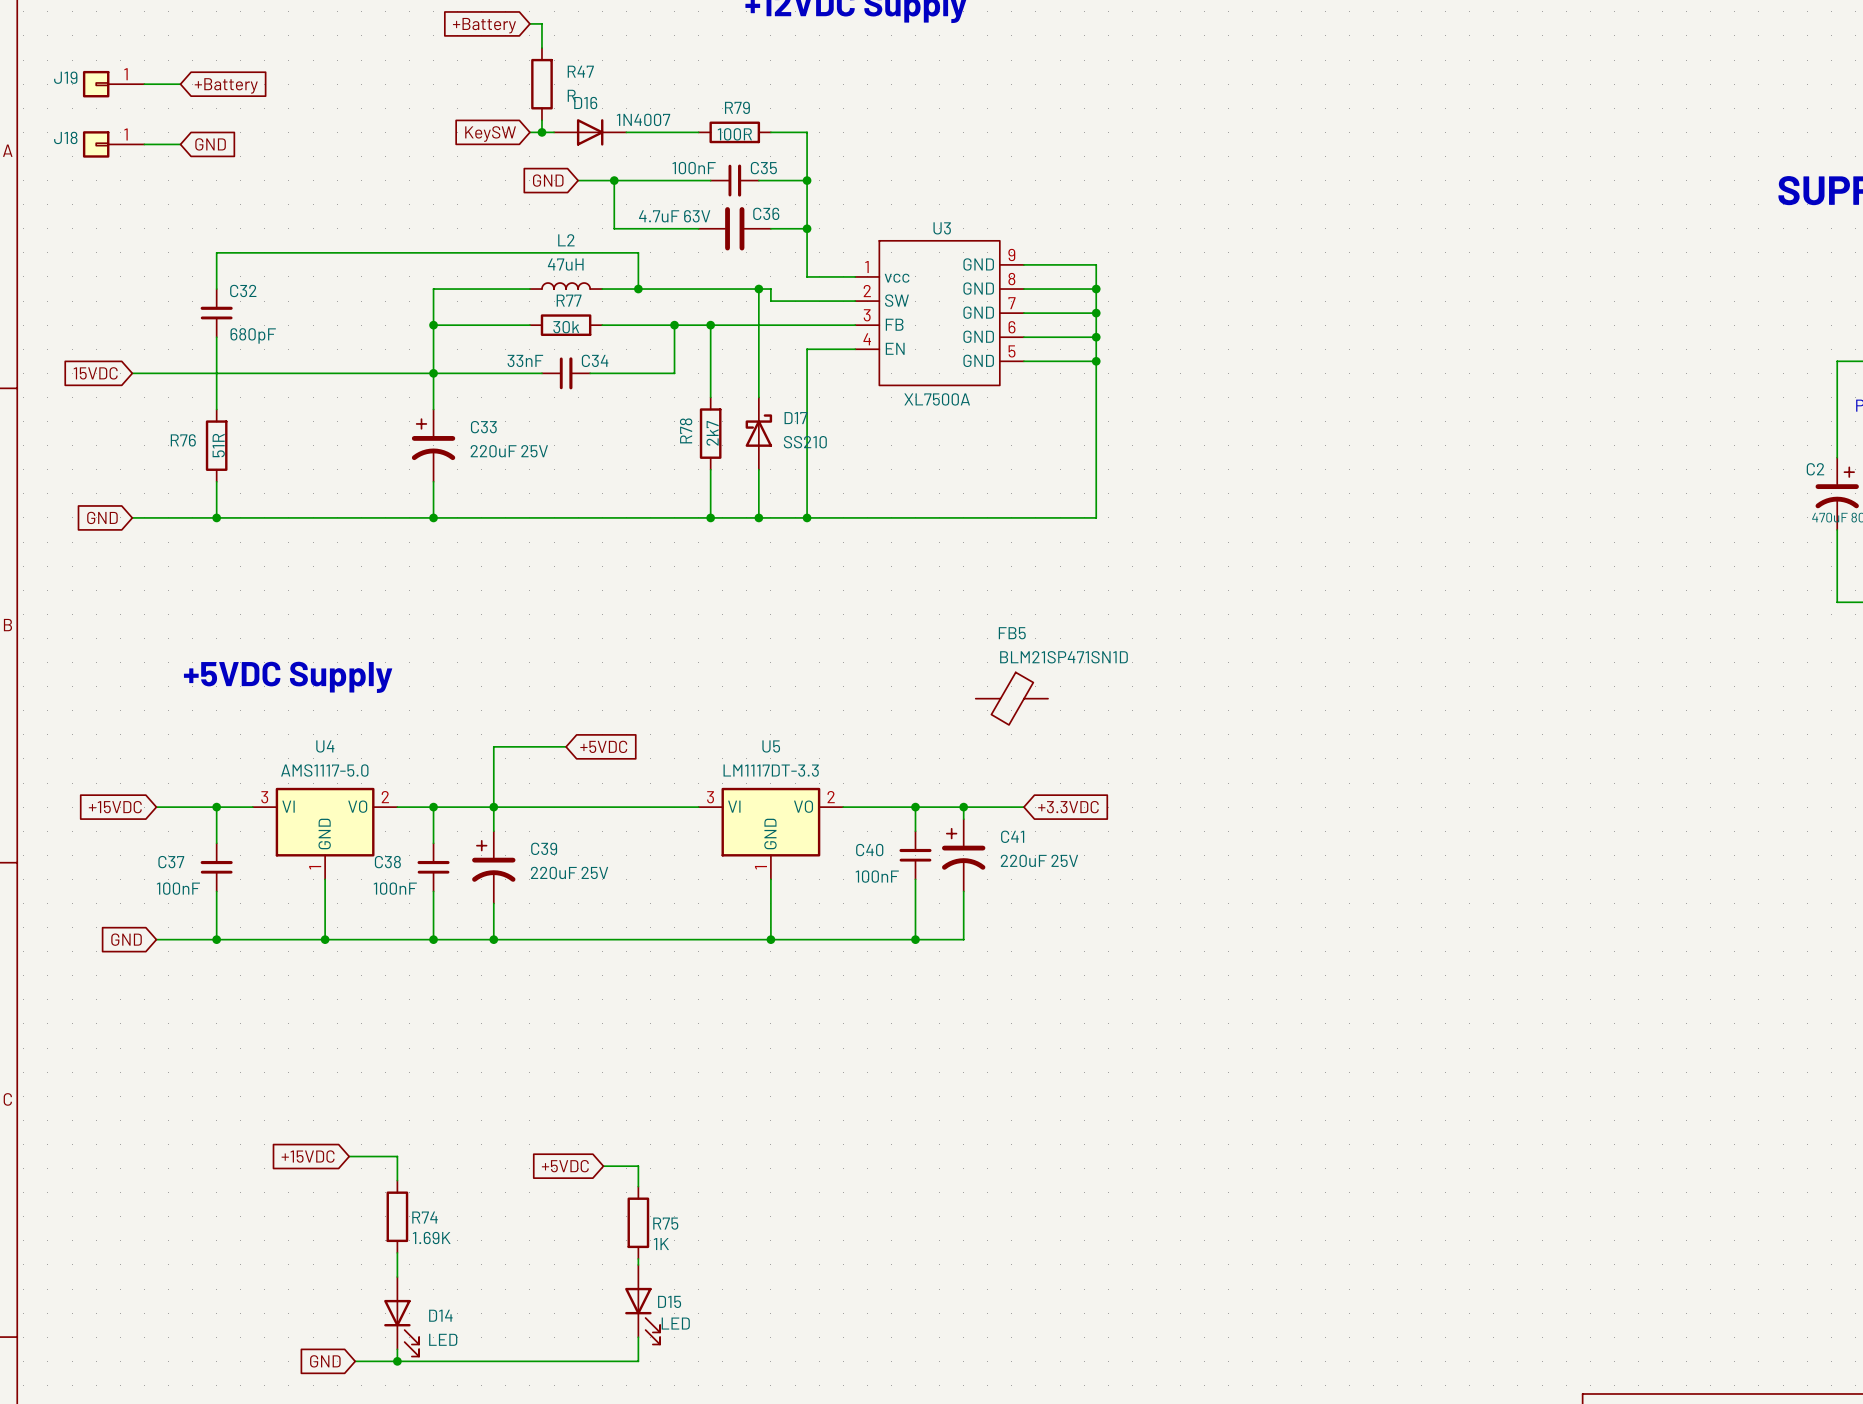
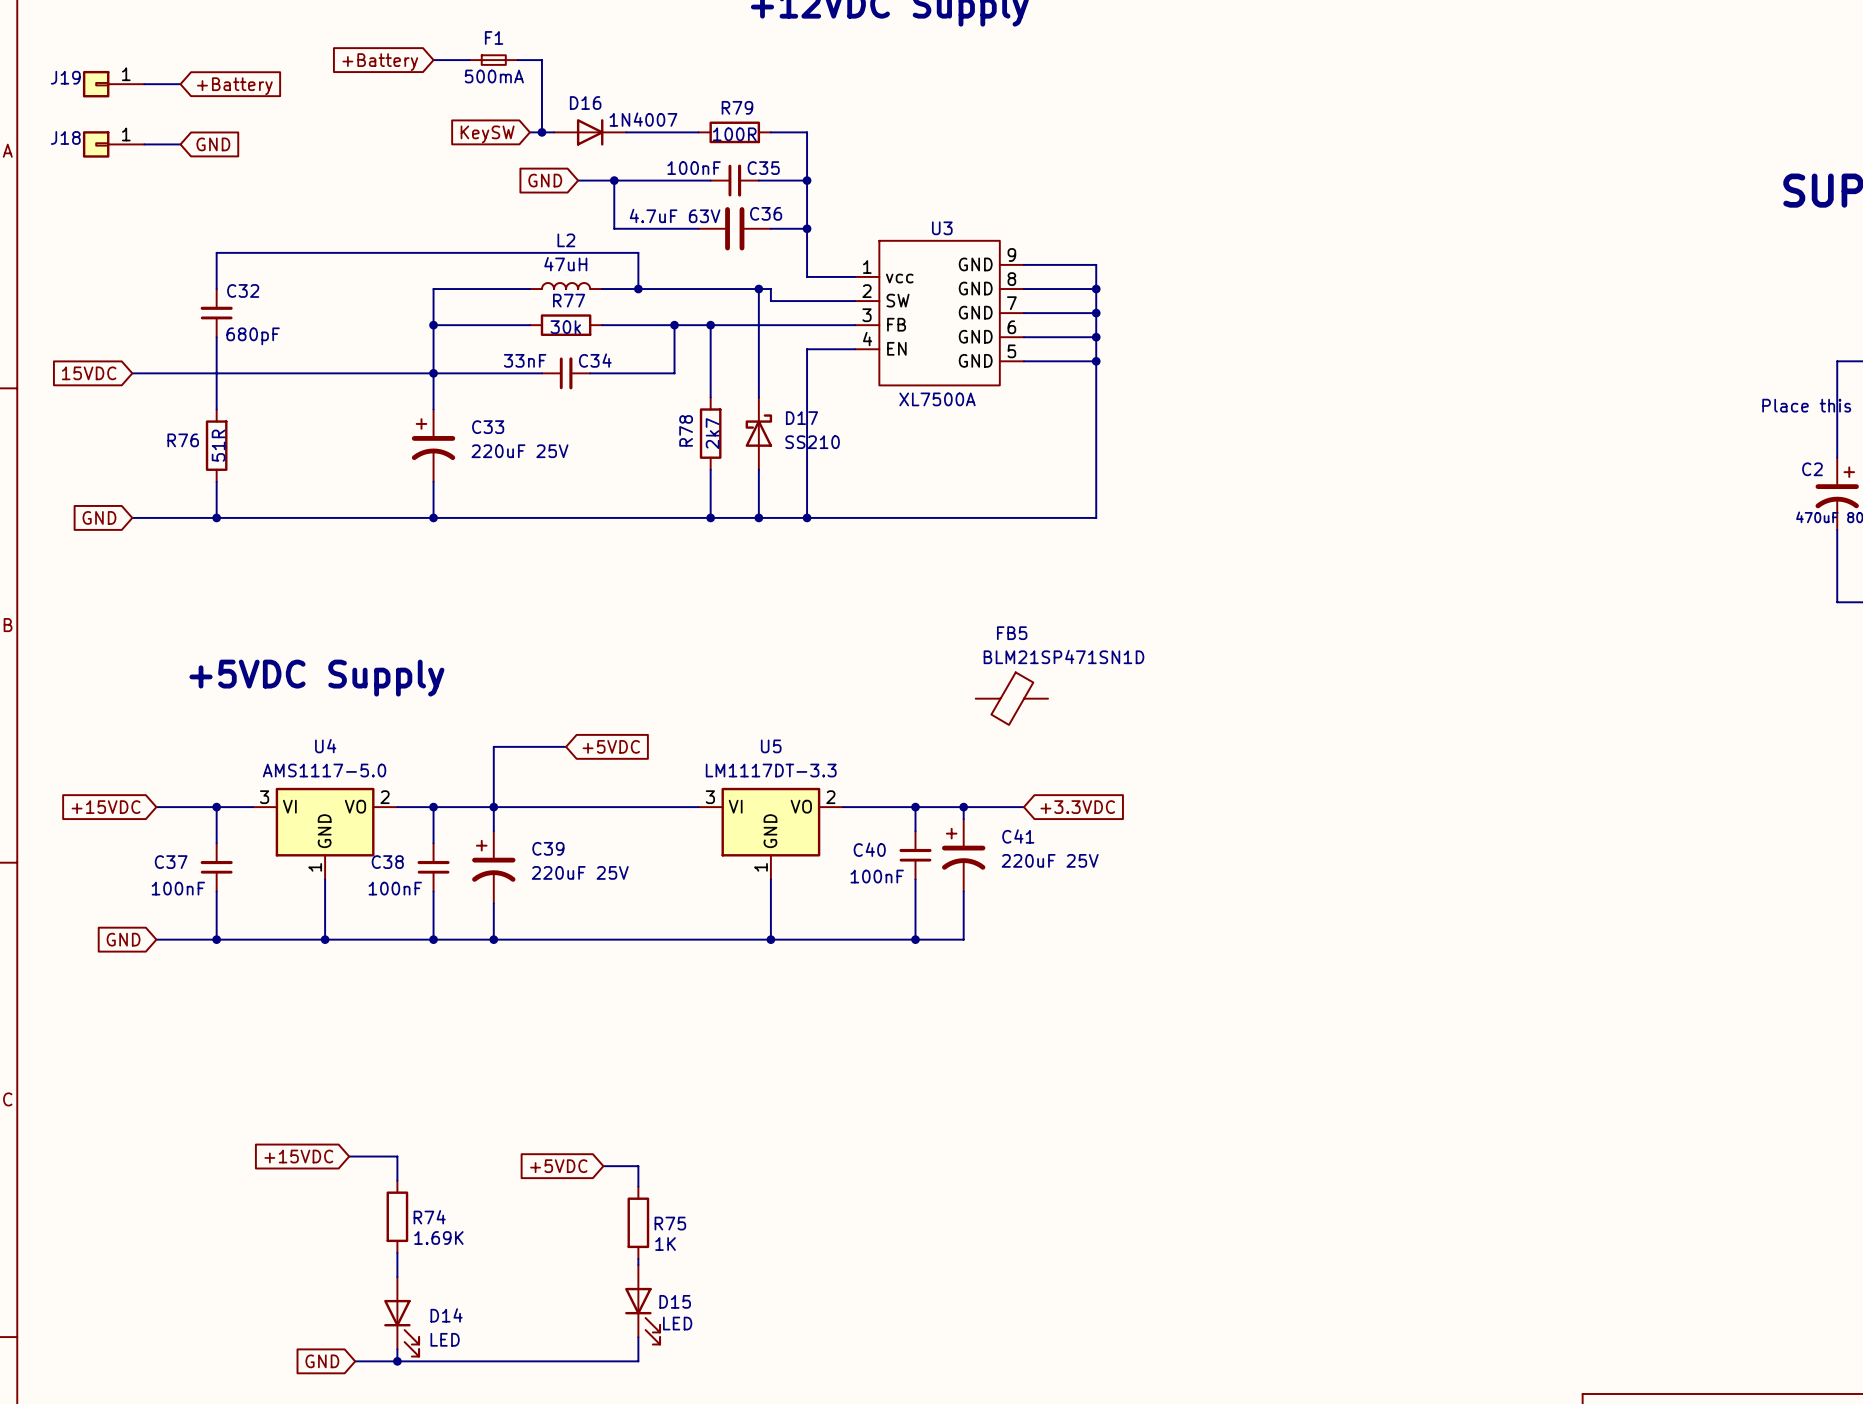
wire: (529, 23) (541, 23) (541, 48) -> none
global label position: +Battery (484, 25) -> +Battery (380, 62)
wire: none -> (433, 60) (469, 60)
F1: none -> 500mA (493, 60)
wire: none -> (517, 60) (541, 60) (541, 120)
R47: R (541, 84) -> none

